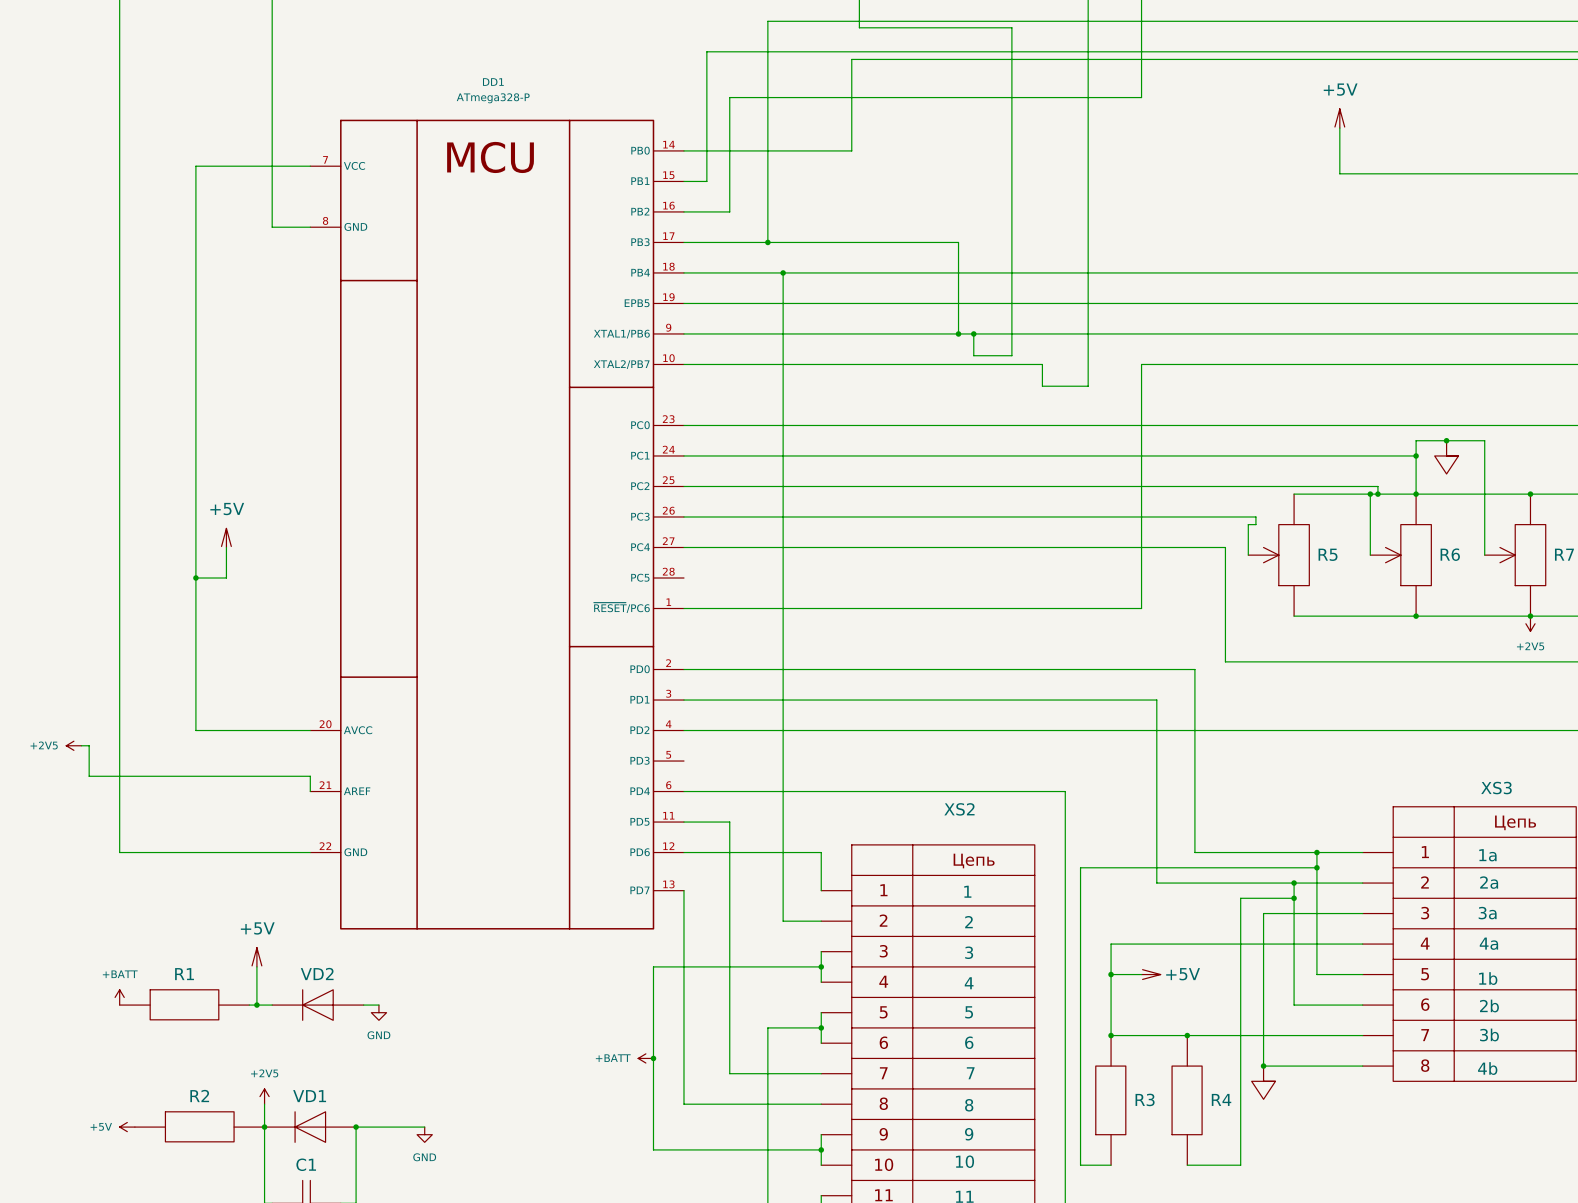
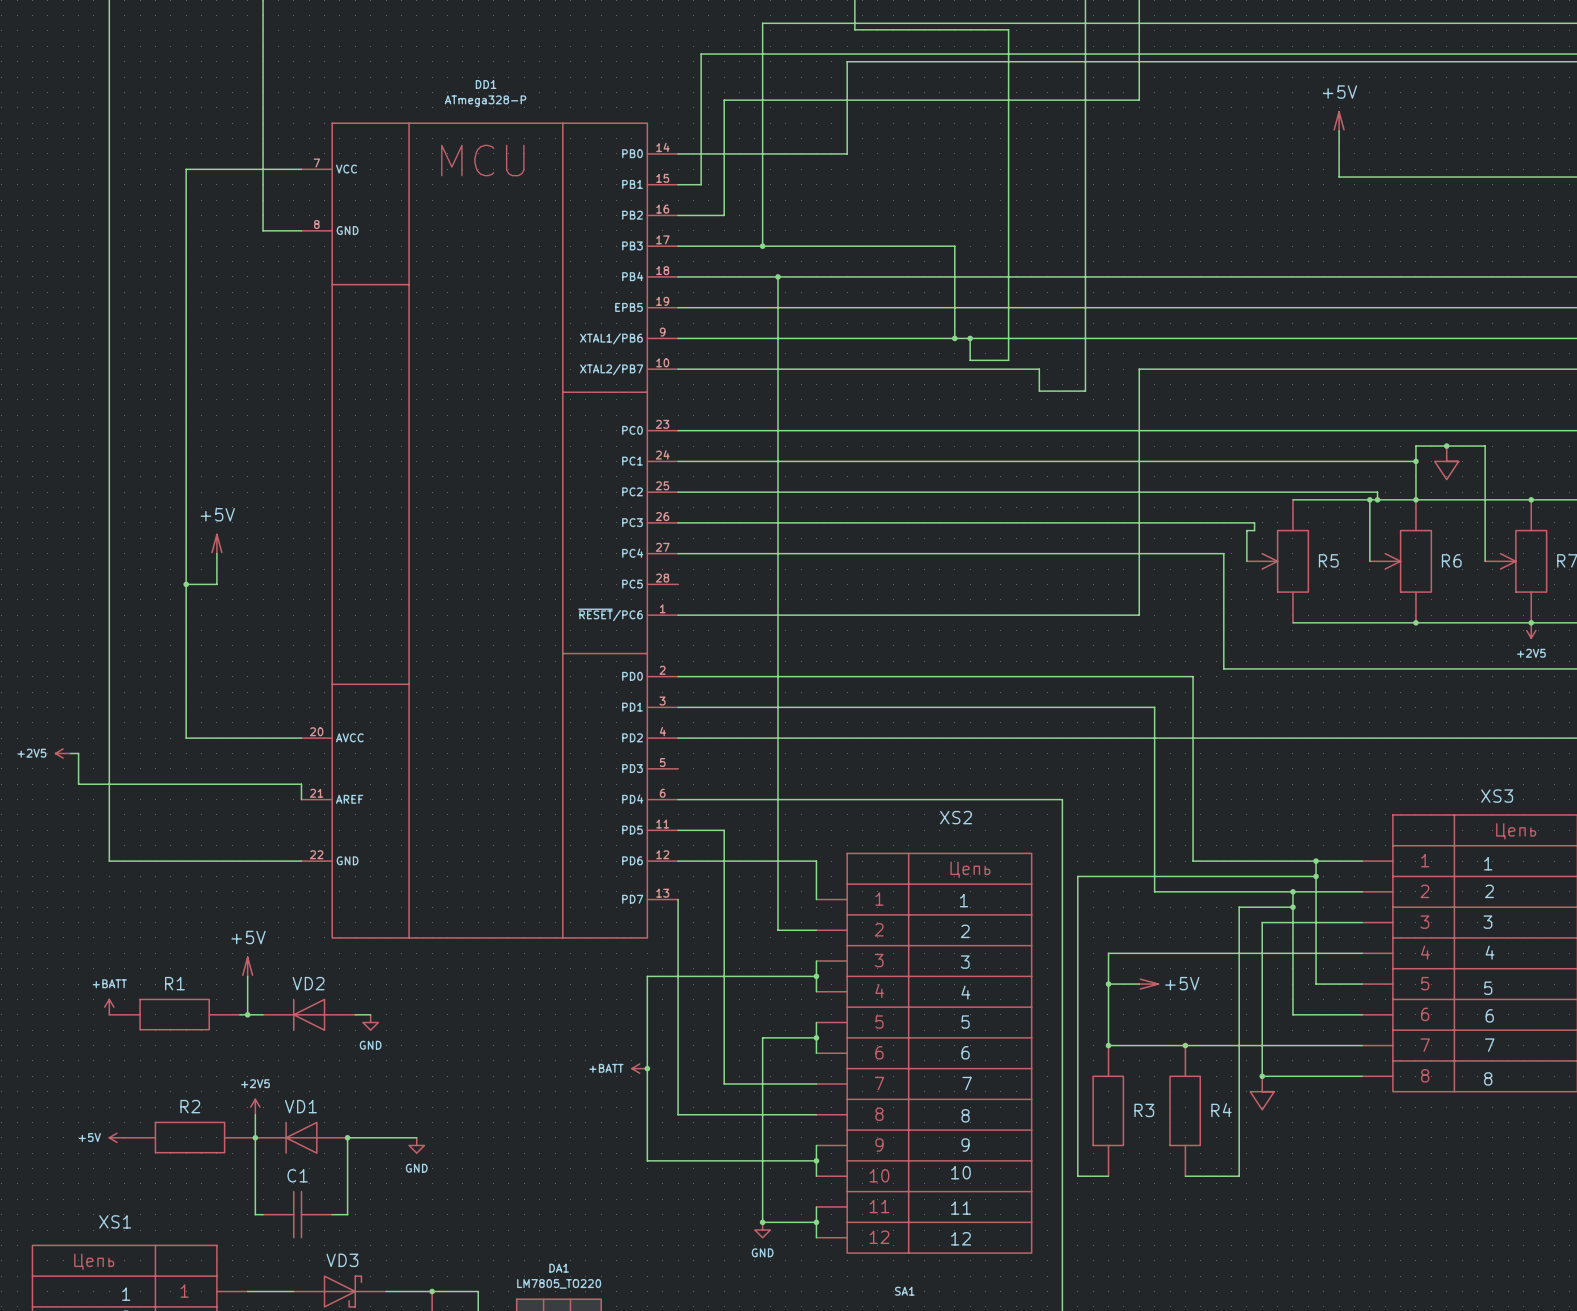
XS3 text: 1a (1487, 855) -> 1 (1488, 863)
XS3 text: 2a (1489, 882) -> 2 (1489, 891)
XS3 text: 3a (1487, 913) -> 3 (1487, 922)
XS3 text: 4a (1488, 943) -> 4 (1490, 952)
XS3 text: 1b (1488, 978) -> 5 (1488, 988)
XS3 text: 2b (1489, 1005) -> 6 (1489, 1015)
XS3 text: 3b (1489, 1034) -> 7 (1489, 1045)
XS3 text: 4b (1487, 1068) -> 8 (1488, 1078)

